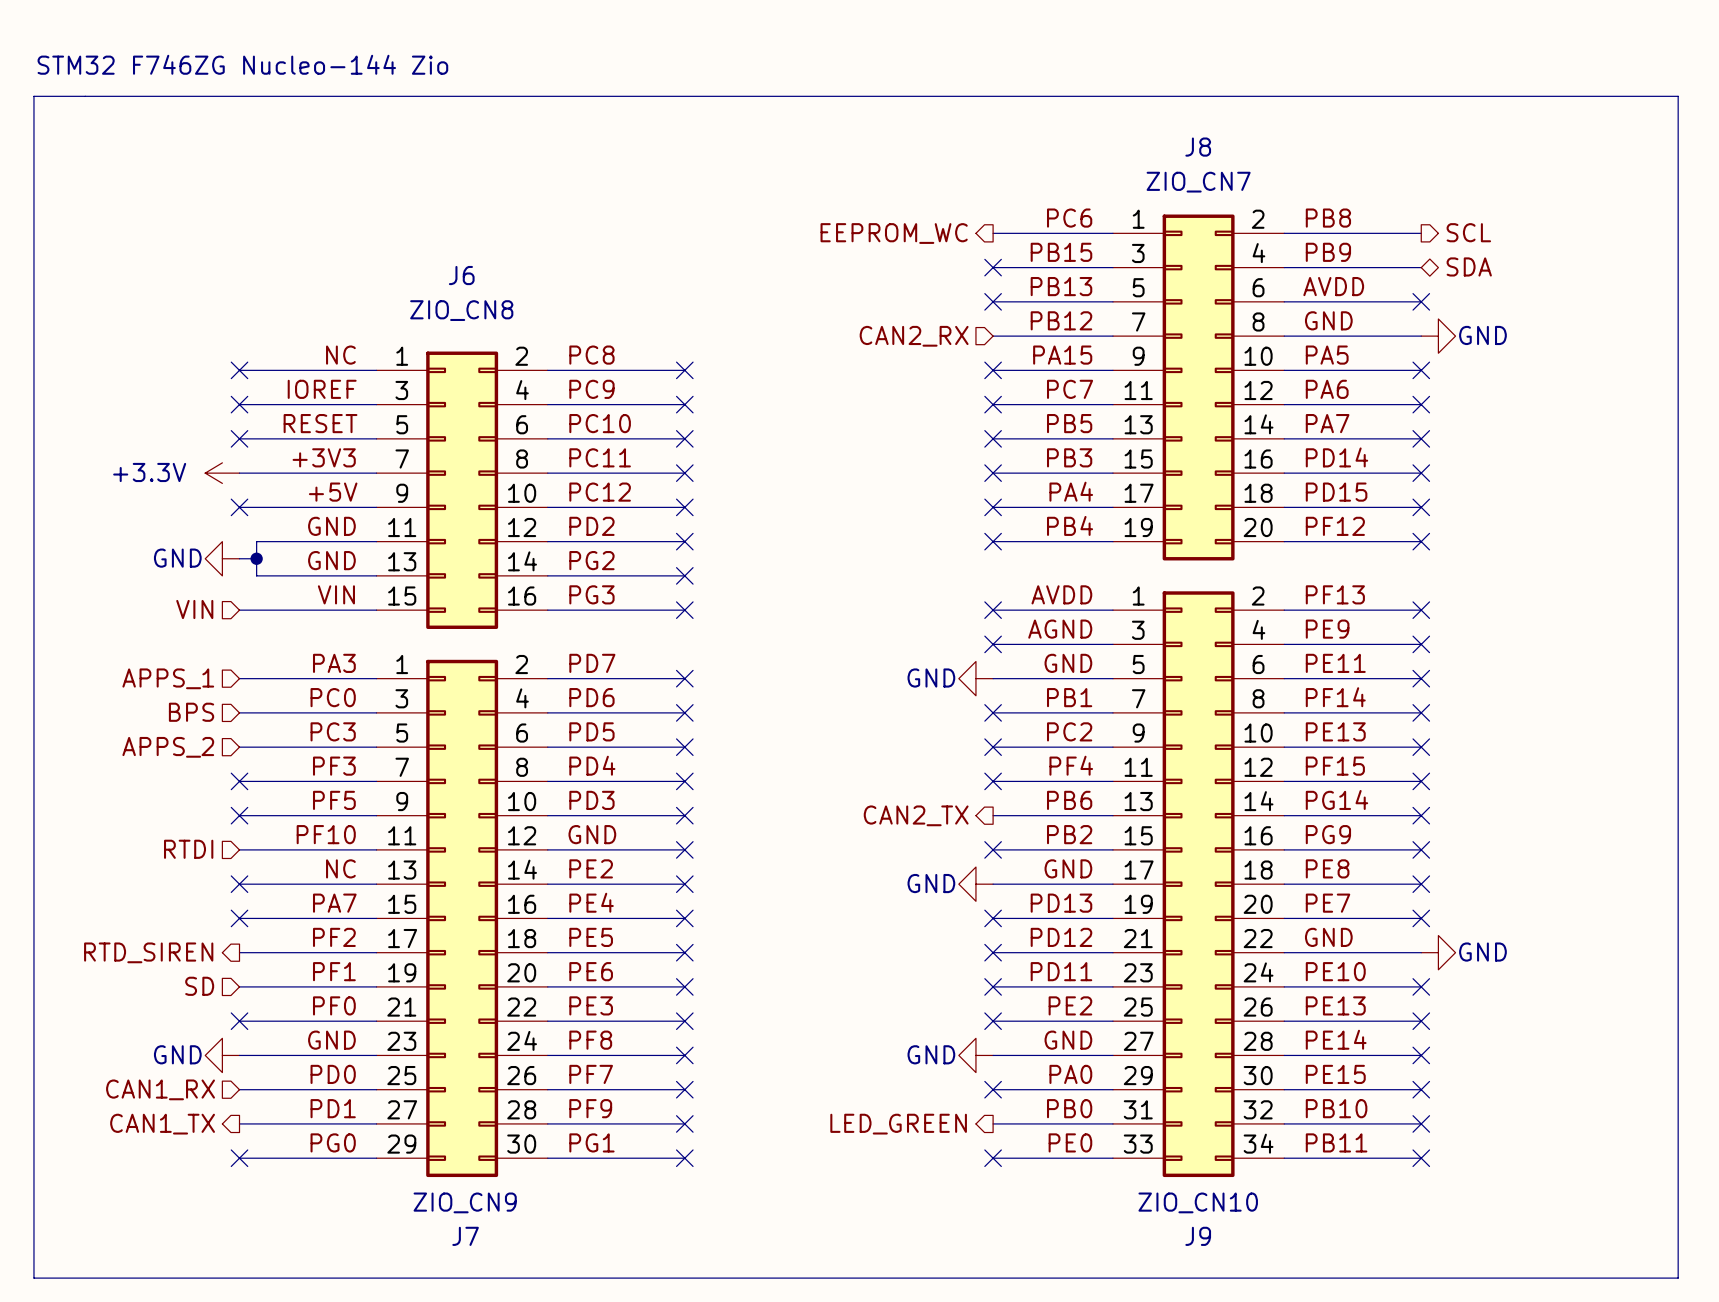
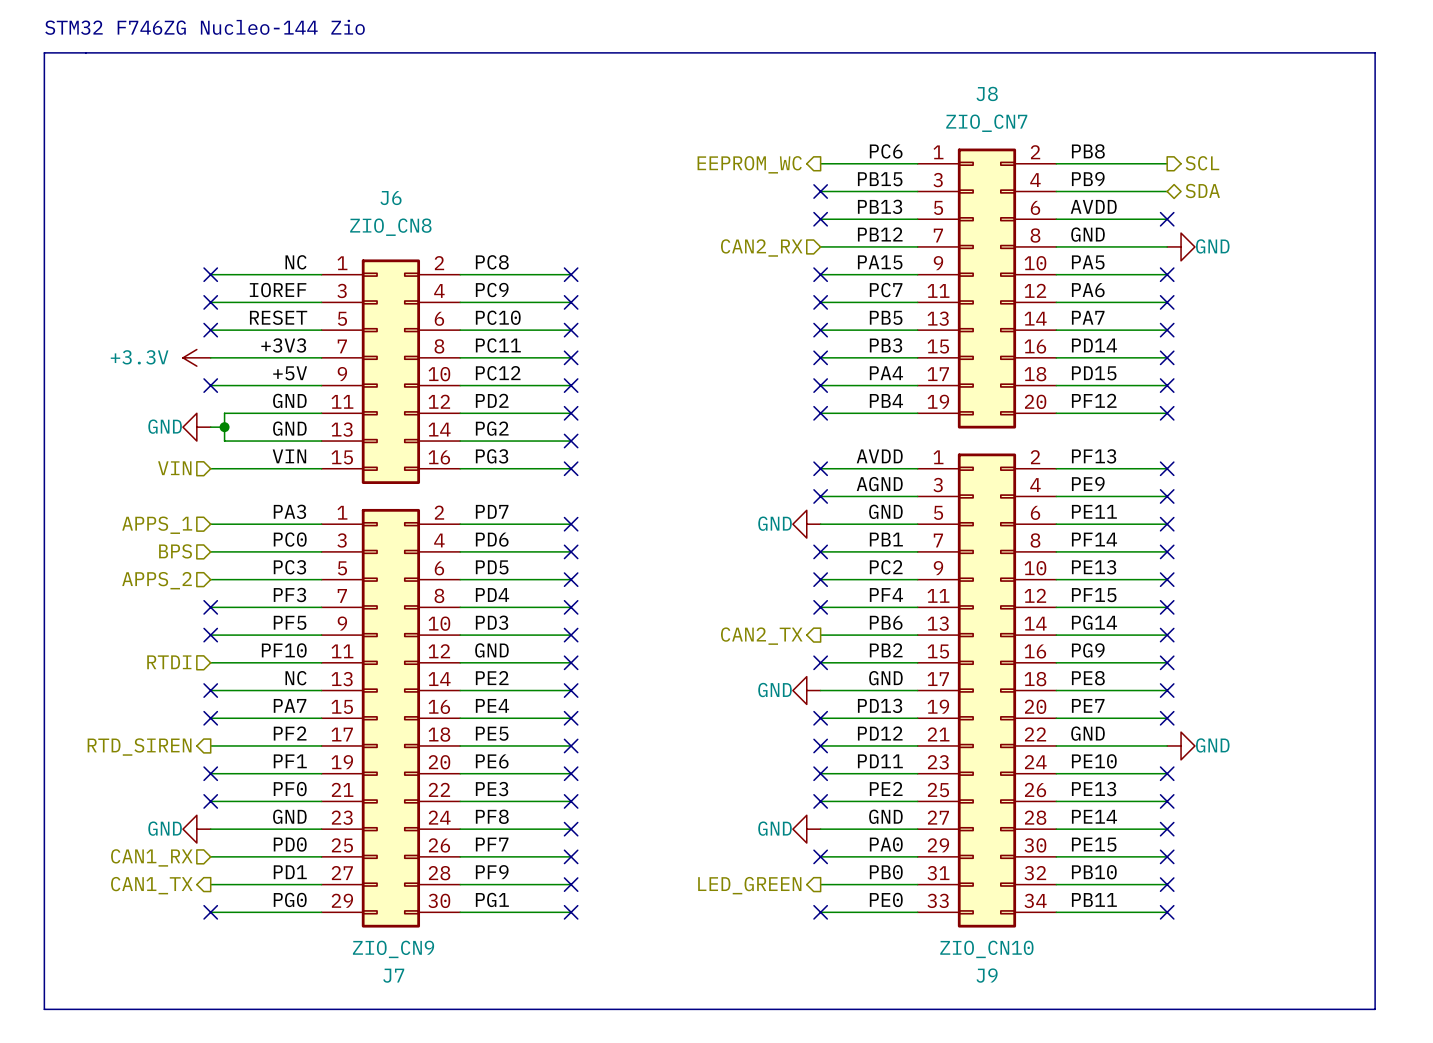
hierarchical label: SD (199, 986) -> none
no-connect mark: none -> (210, 773)

